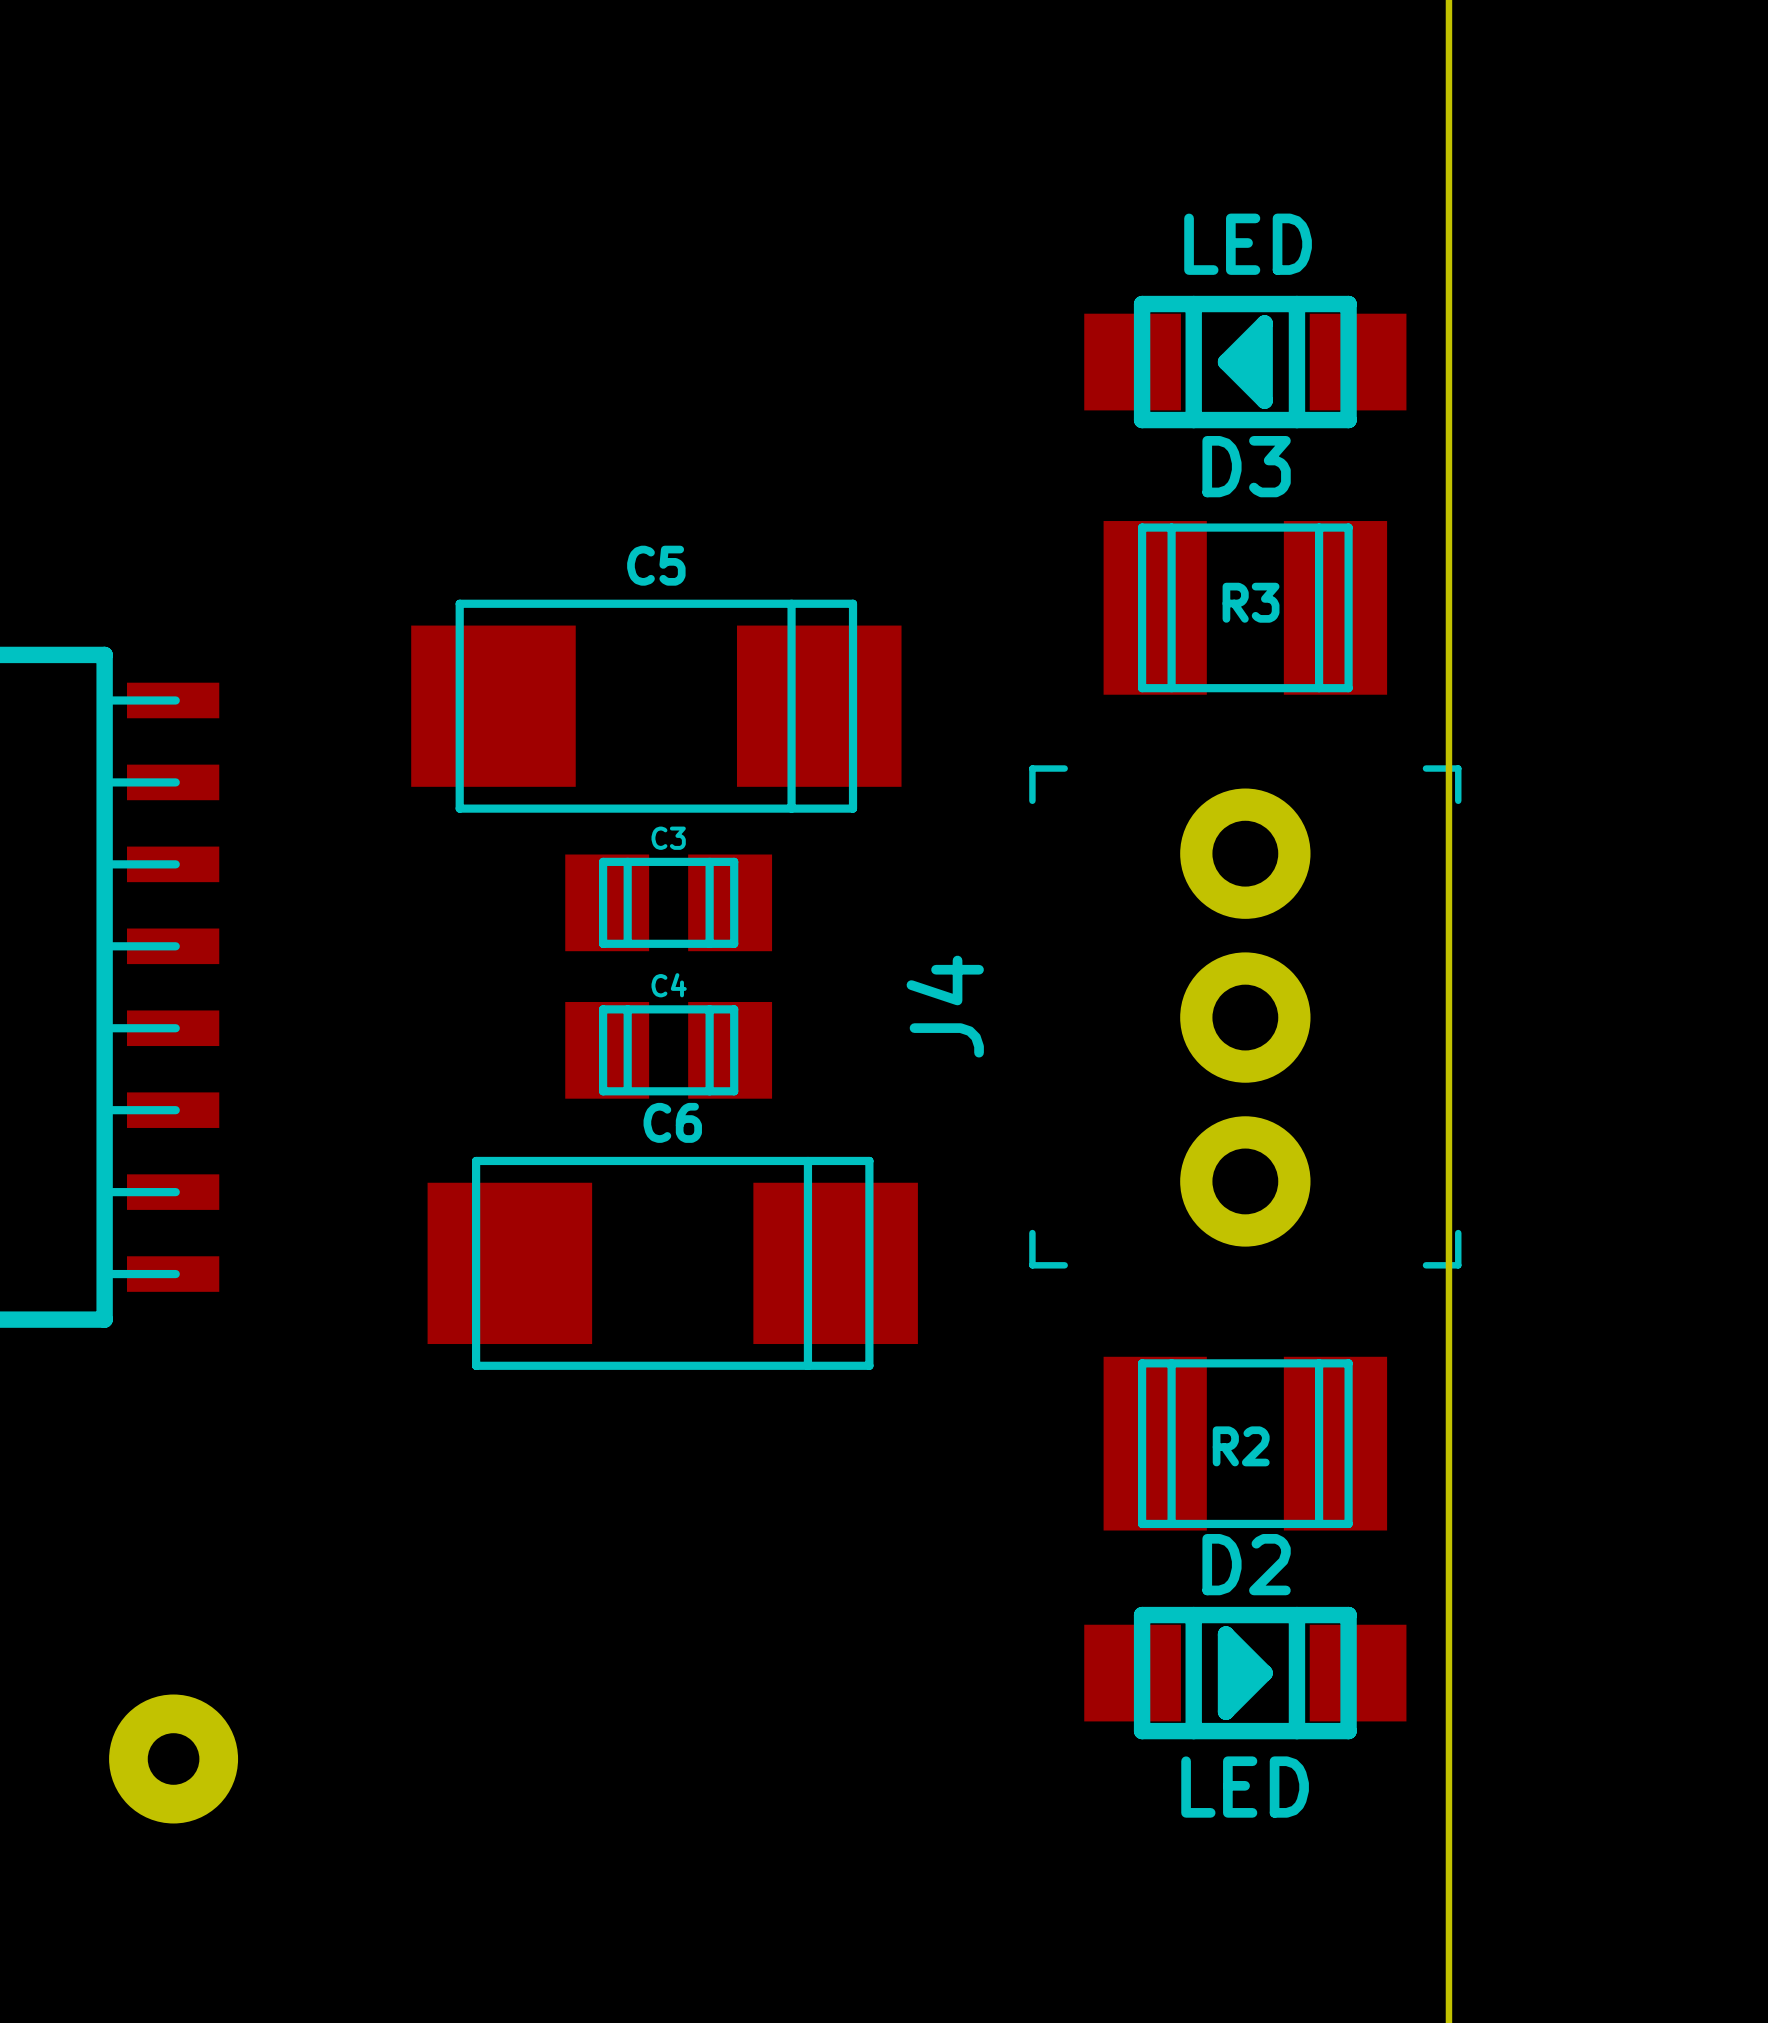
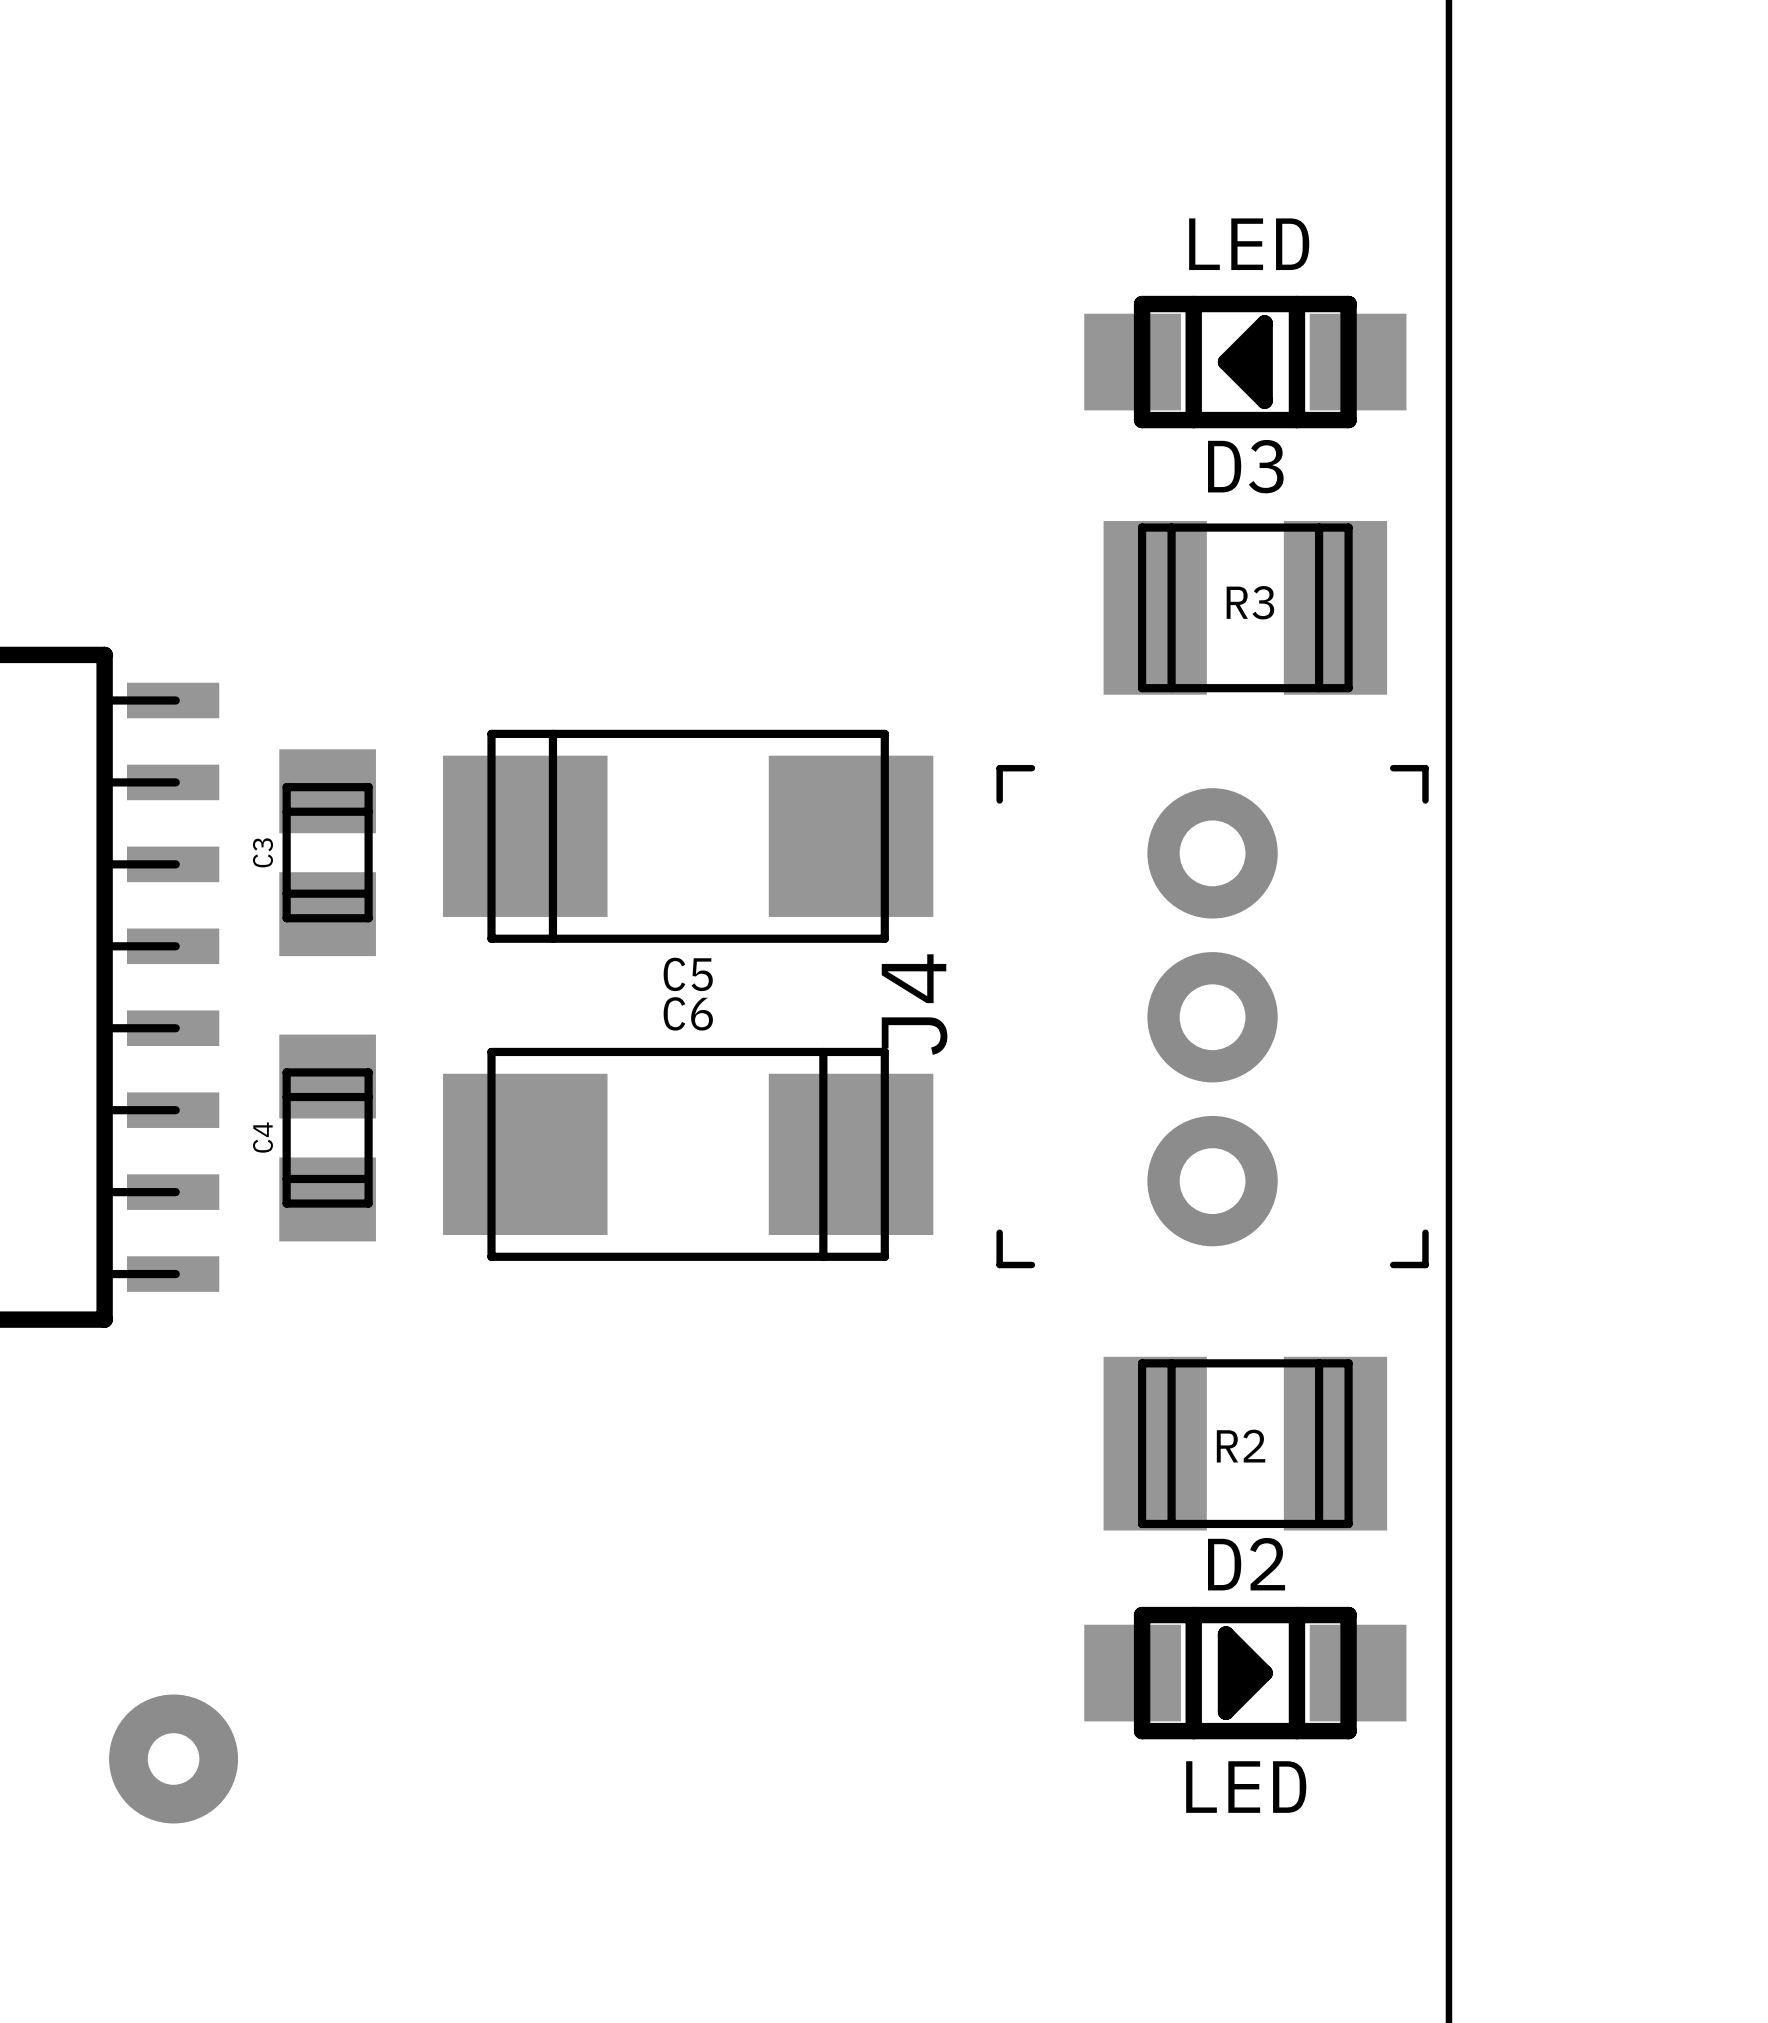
C5 rotation: 0° (656, 706) -> 180° (688, 836)
C3 rotation: 0° (668, 902) -> 90° counterclockwise (327, 852)
C3 position: (668, 902) -> (327, 852)
J4 position: (1245, 1016) -> (1212, 1016)
C4 rotation: 0° (668, 1050) -> 90° counterclockwise (327, 1137)
C4 position: (668, 1050) -> (327, 1137)
C6 position: (672, 1263) -> (688, 1154)

